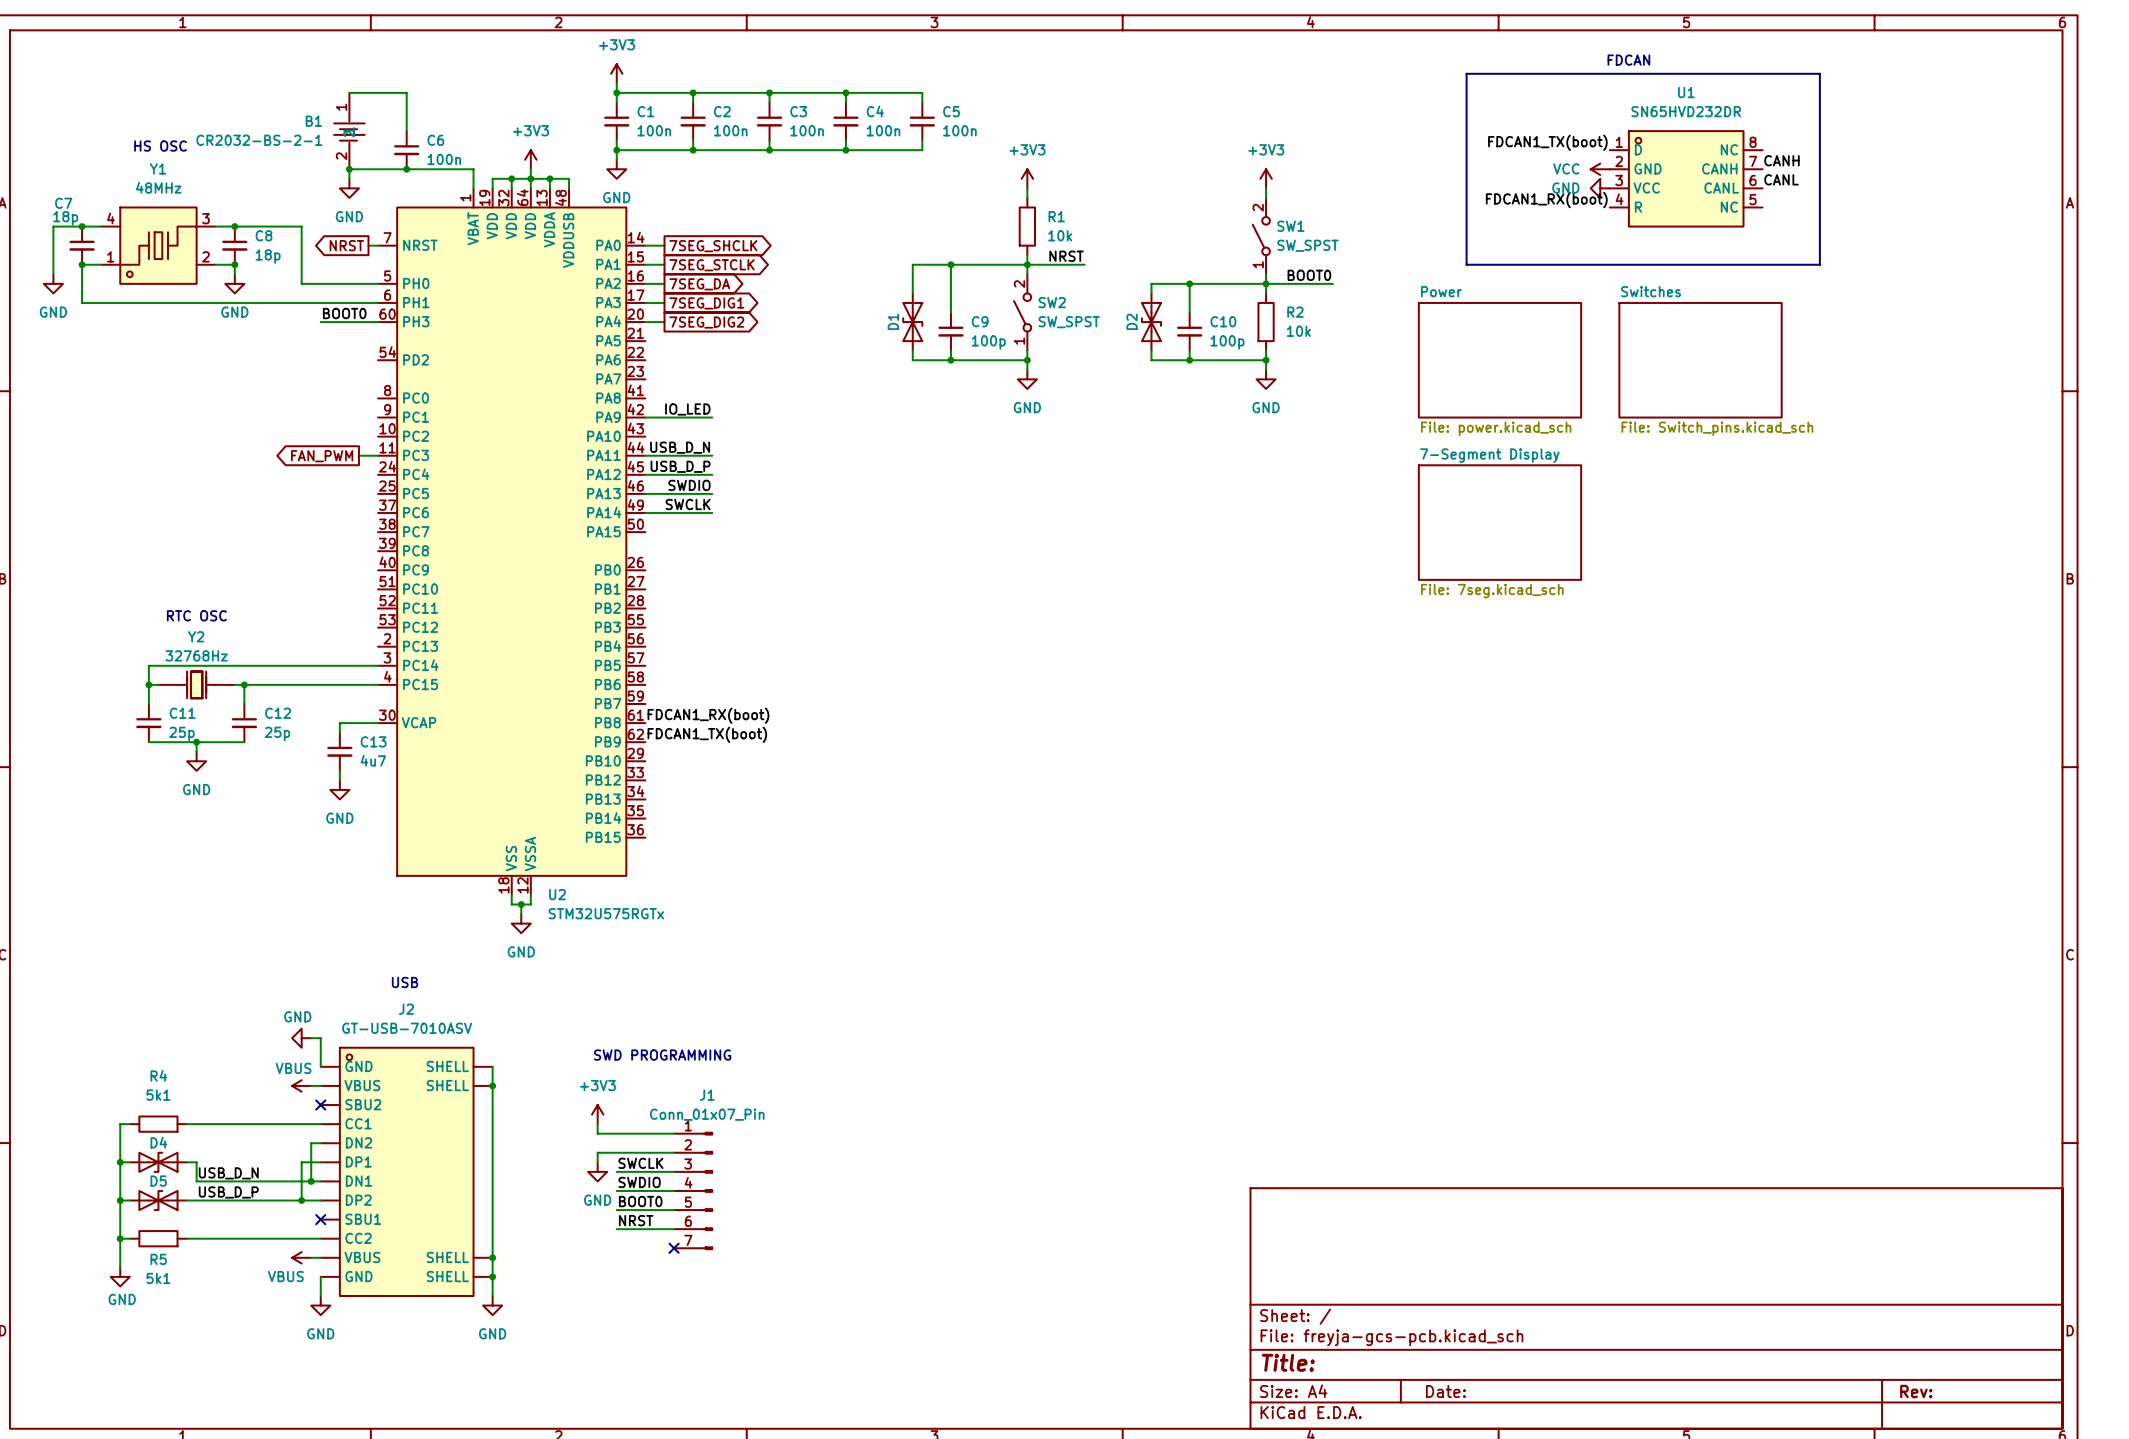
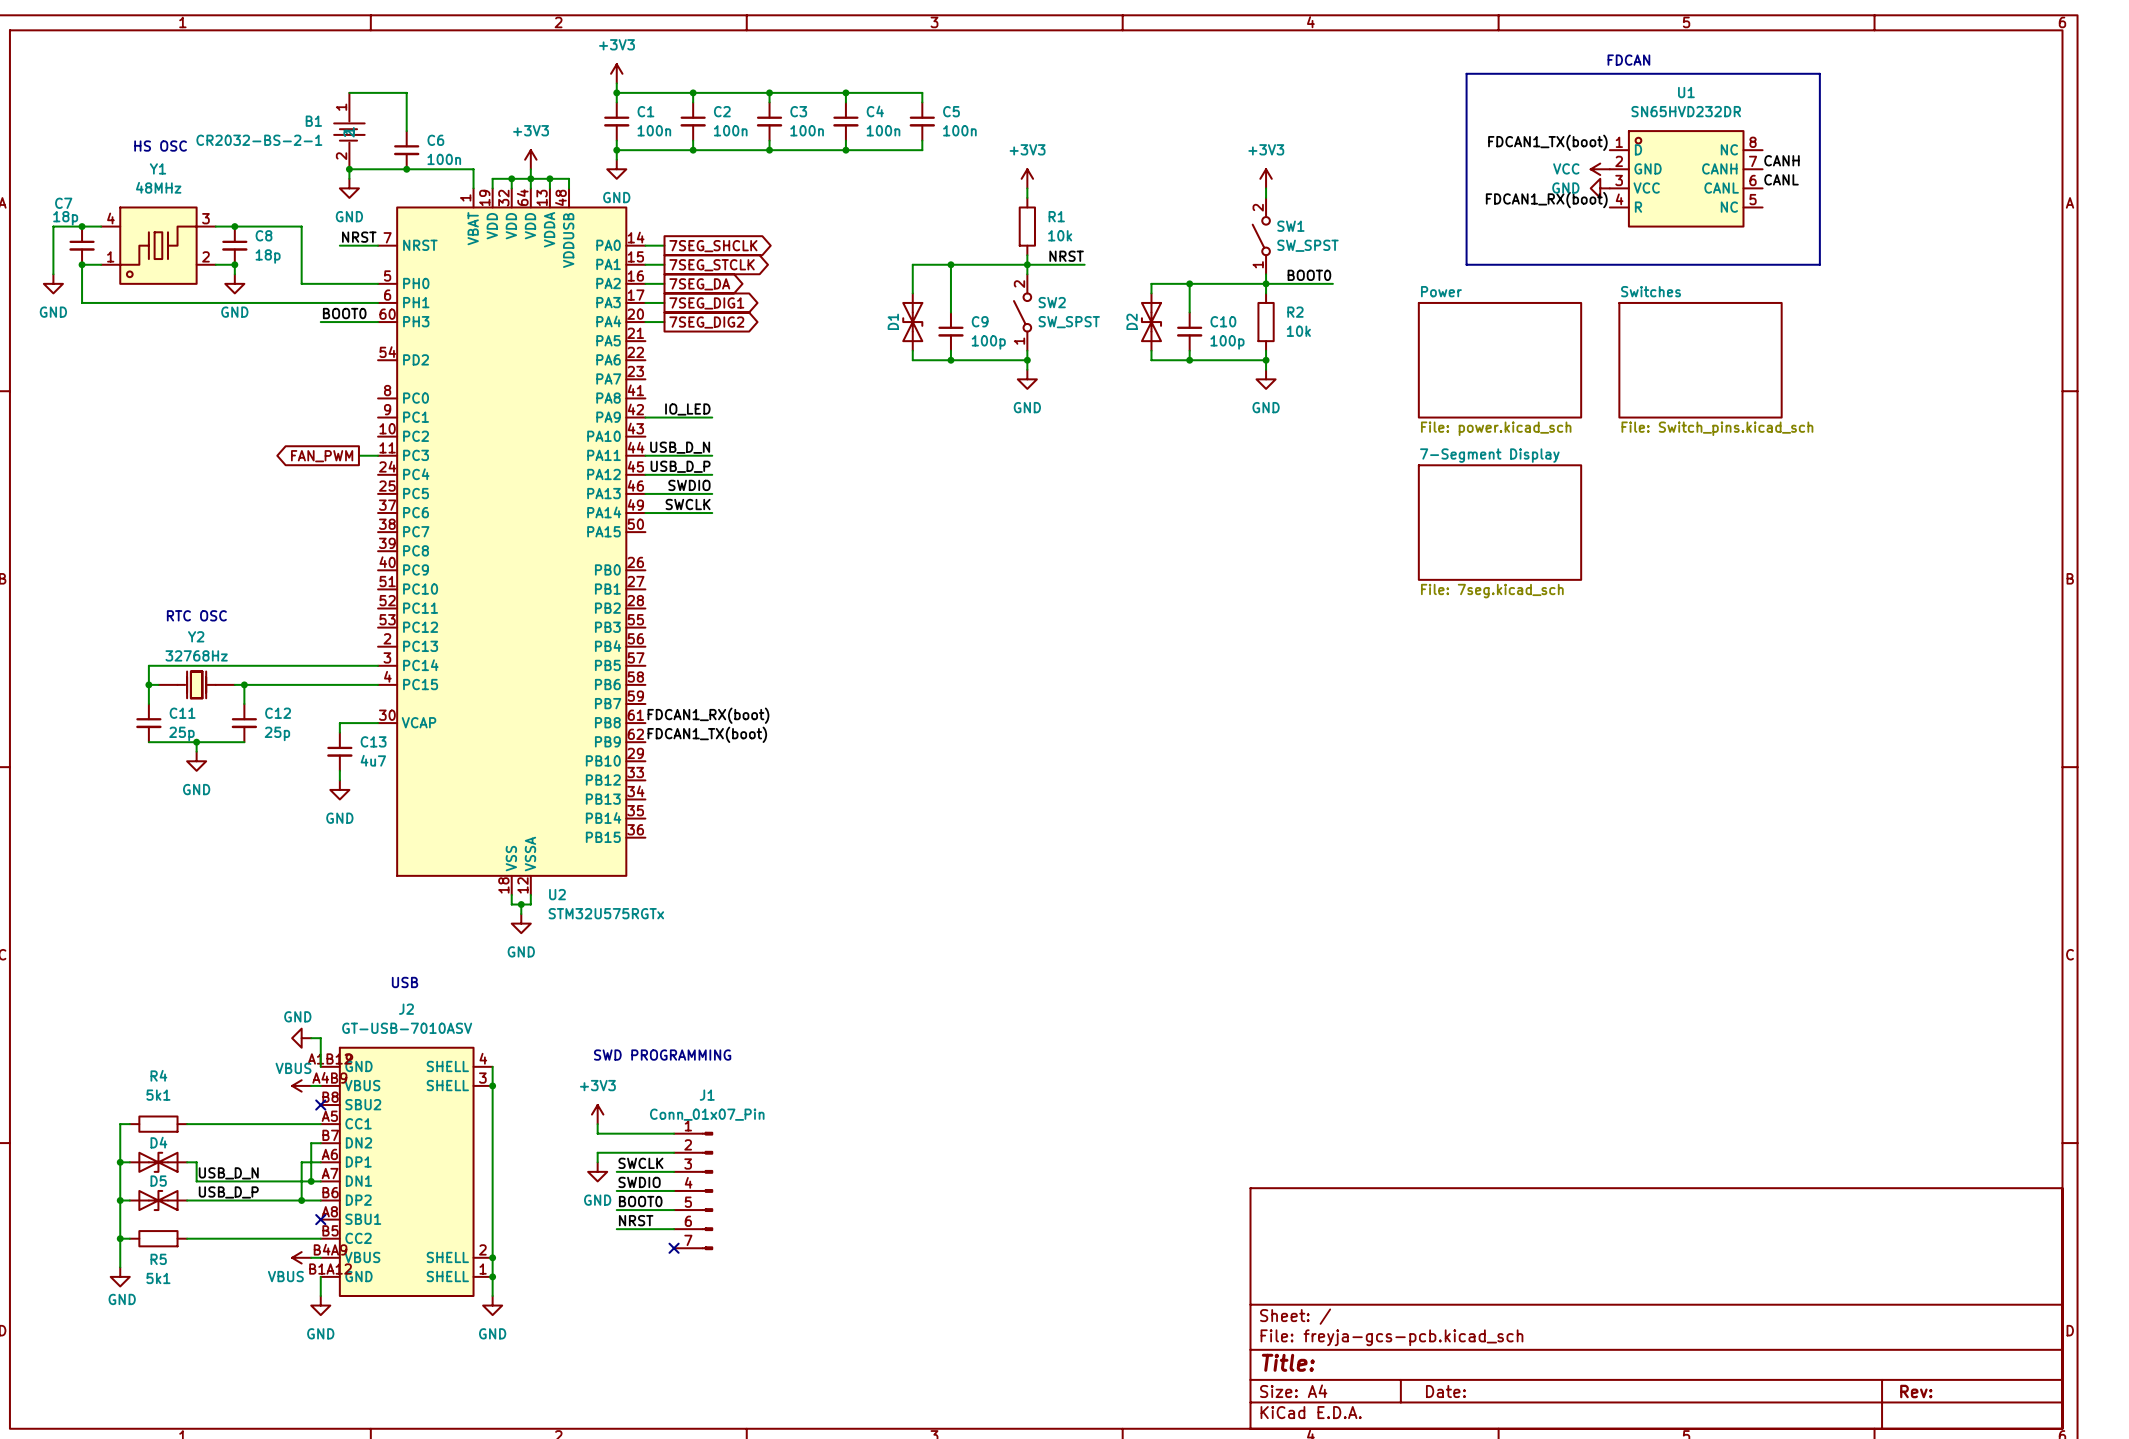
label: none -> NRST (359, 237)
wire: none -> (339, 245) (368, 245)
global label: NRST (346, 245) -> none
J2 symbol: [320, 1047, 493, 1297] -> [320, 1047, 493, 1297]

